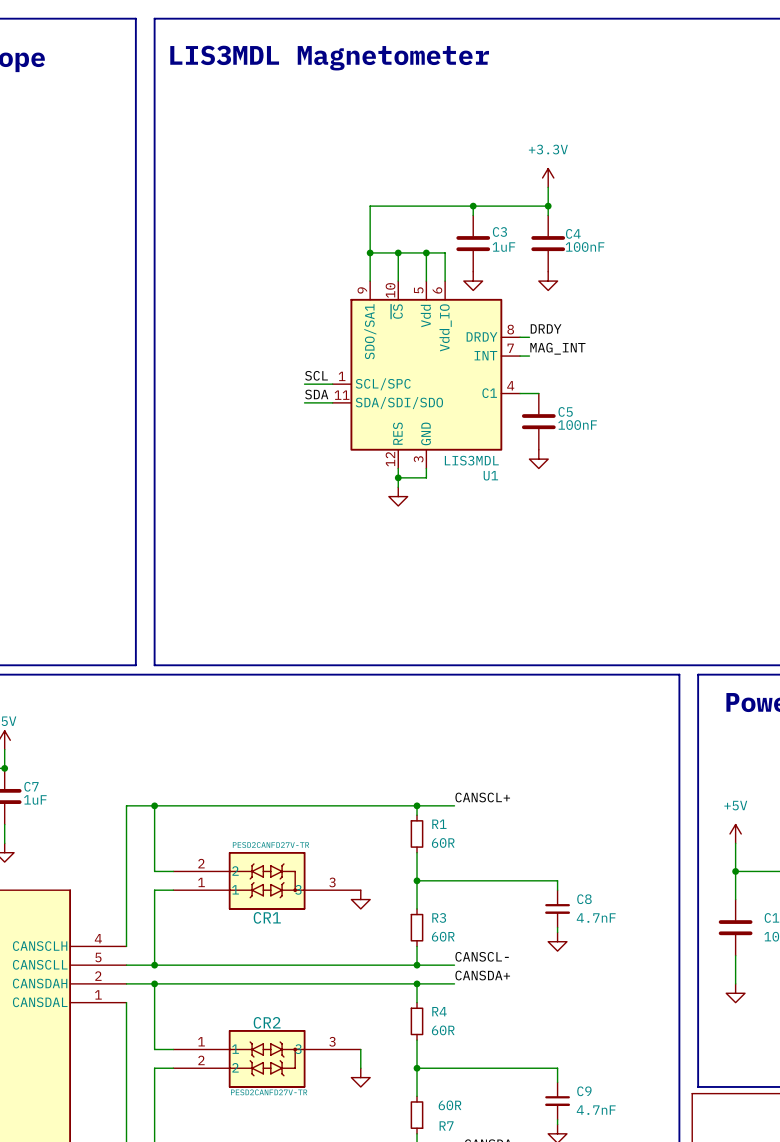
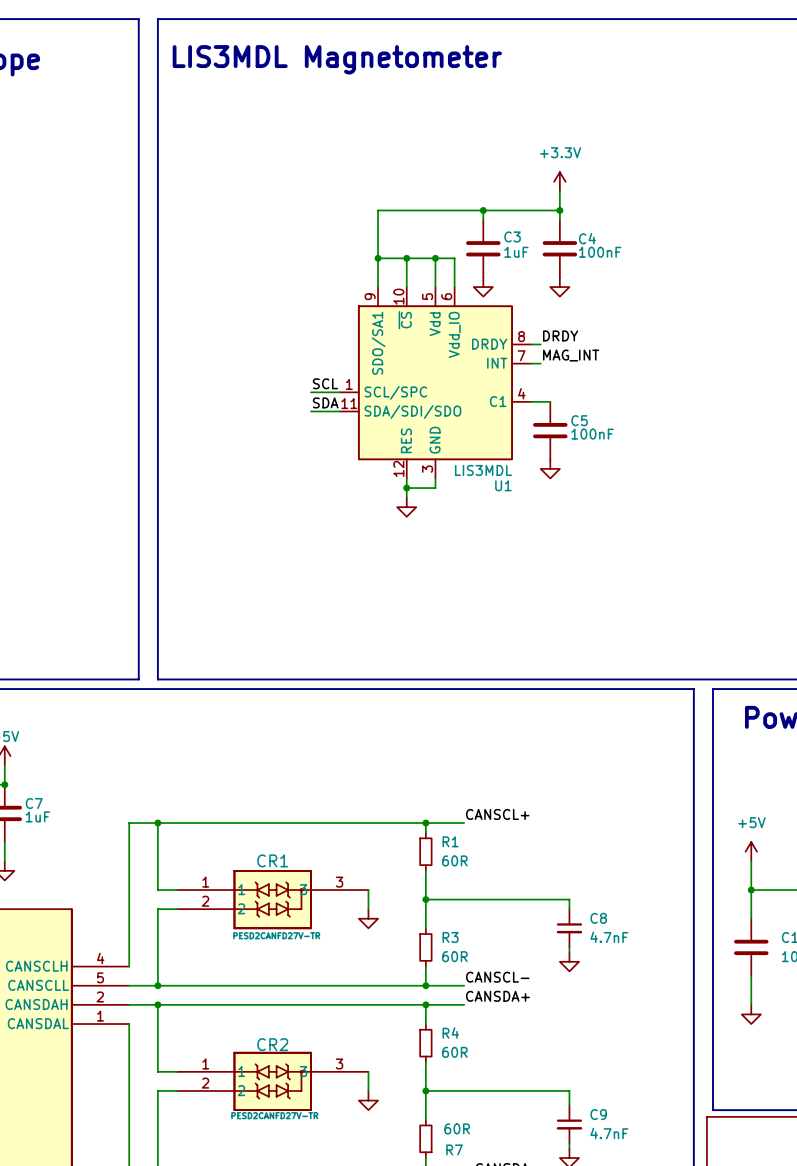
wire: none -> (368, 890) (368, 909)
CR1 flip: as is (267, 880) -> up-down (272, 899)

